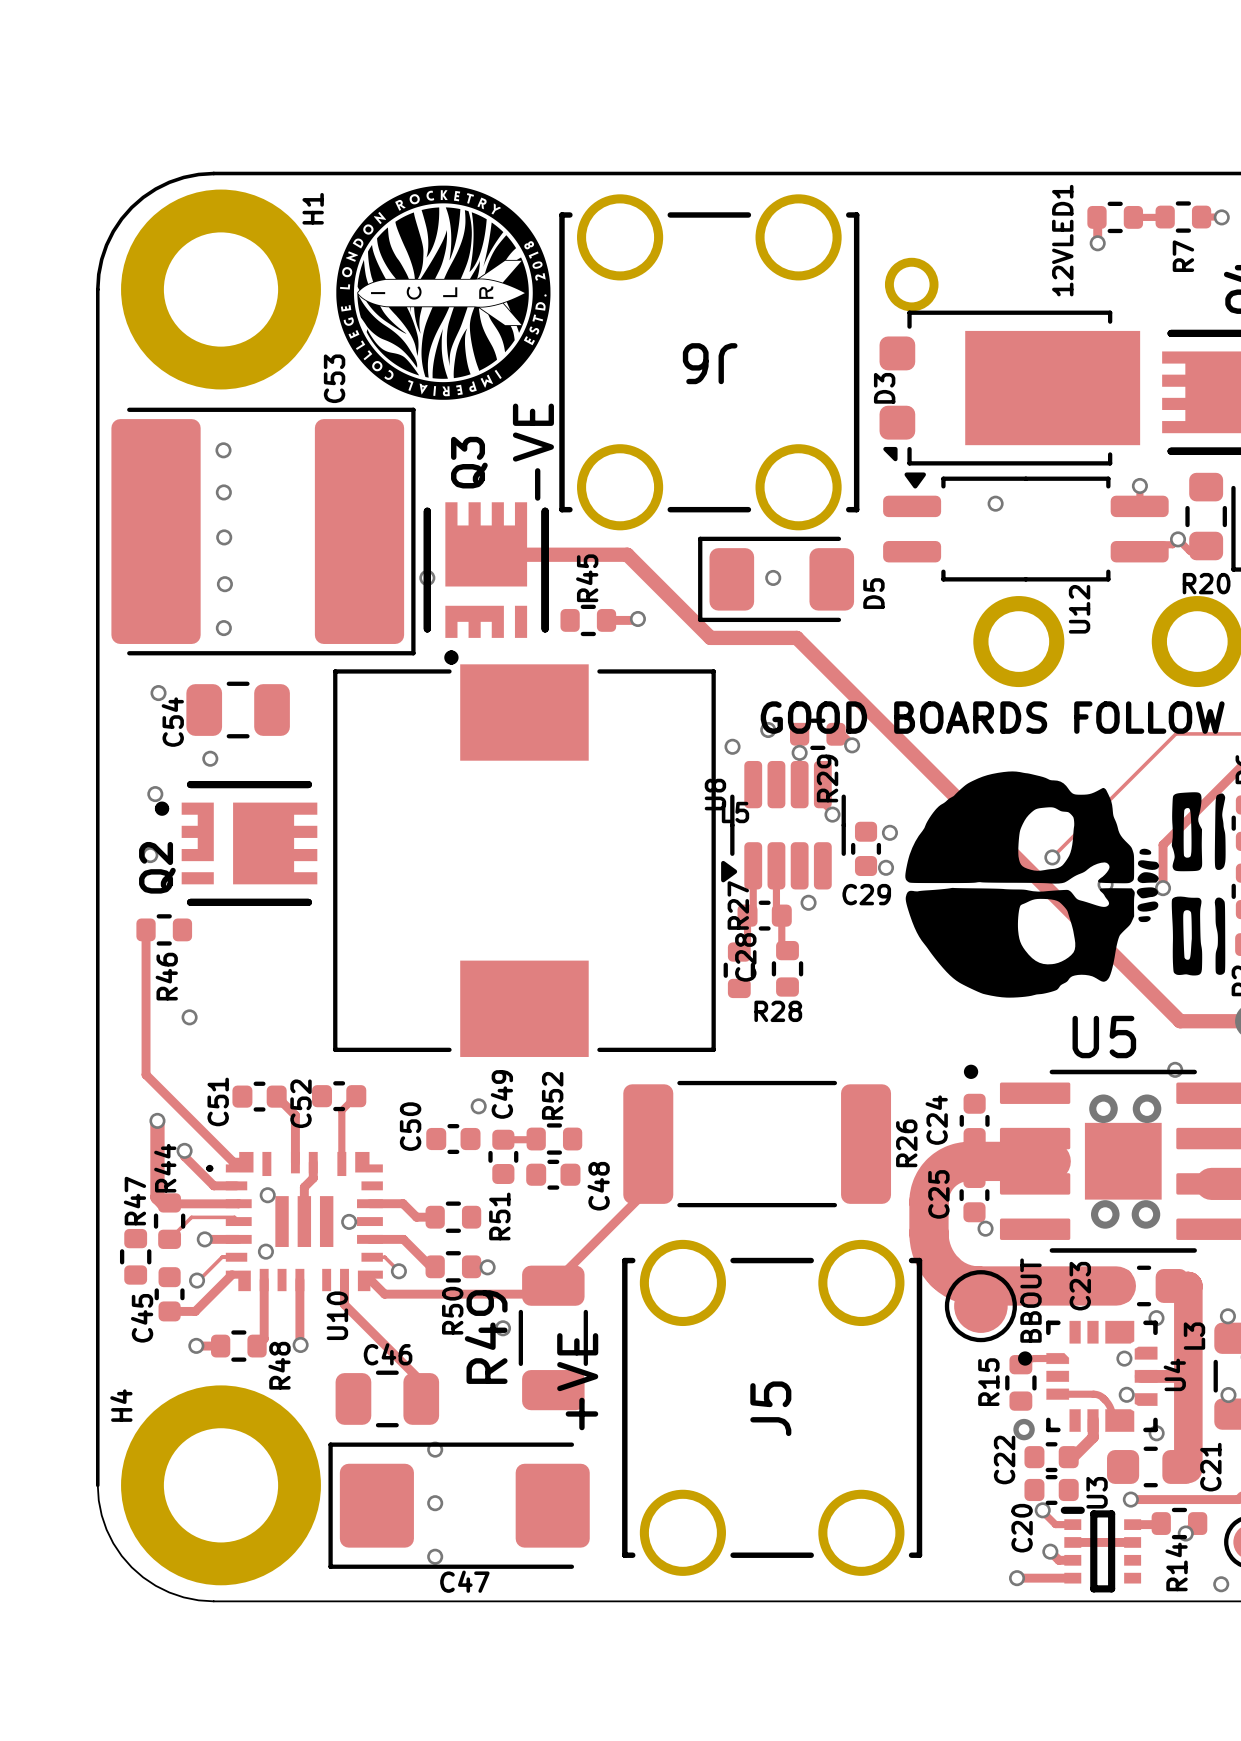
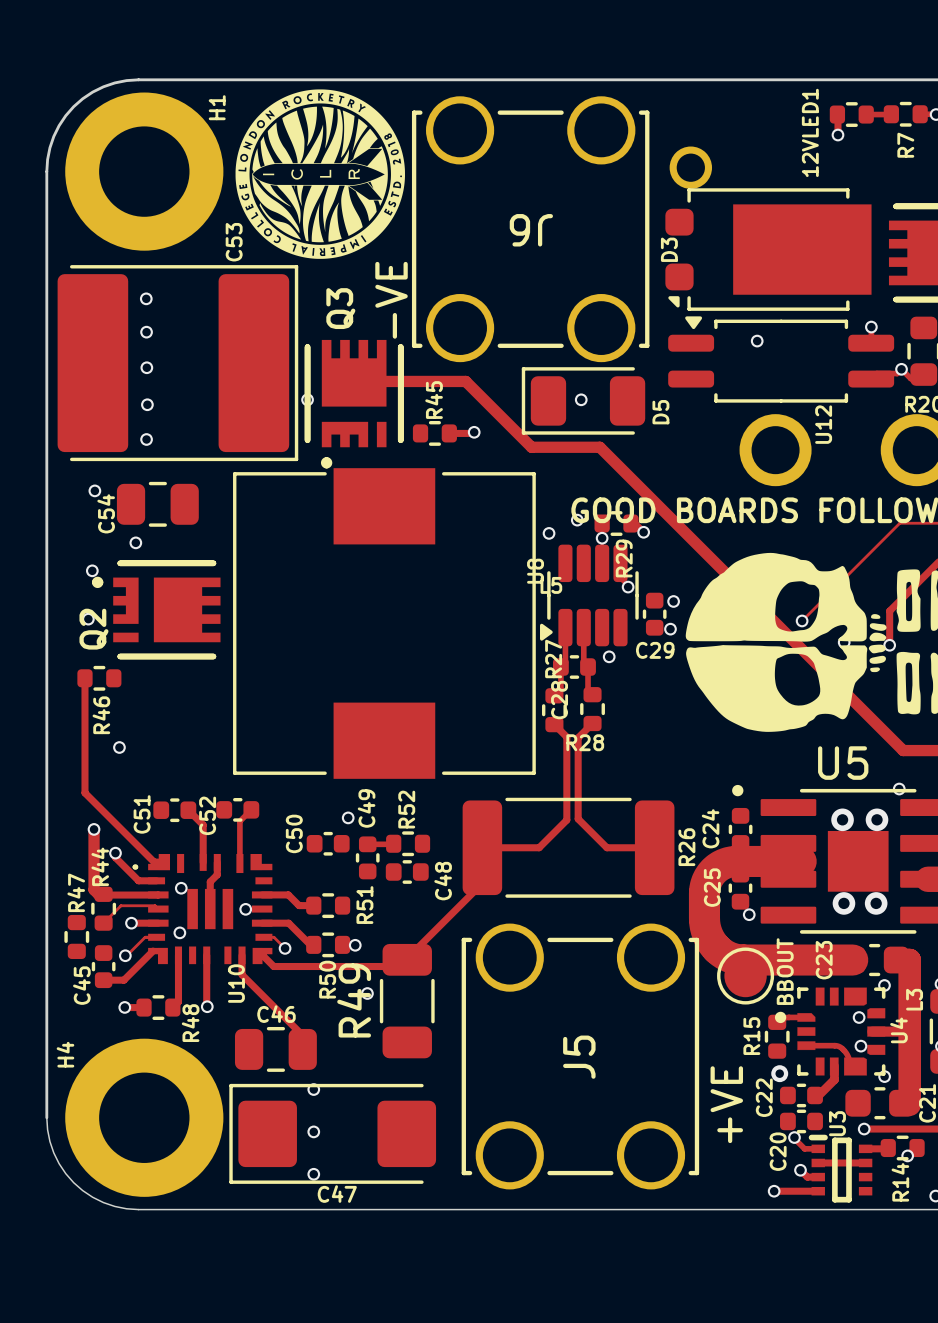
track: none -> (592, 723) (578, 737) (578, 818) (606, 847) (654, 847)
track: none -> (554, 724) (566, 737) (566, 820) (539, 847) (482, 847)
J5 text position: +VE (577, 1381) -> +VE (726, 1104)

